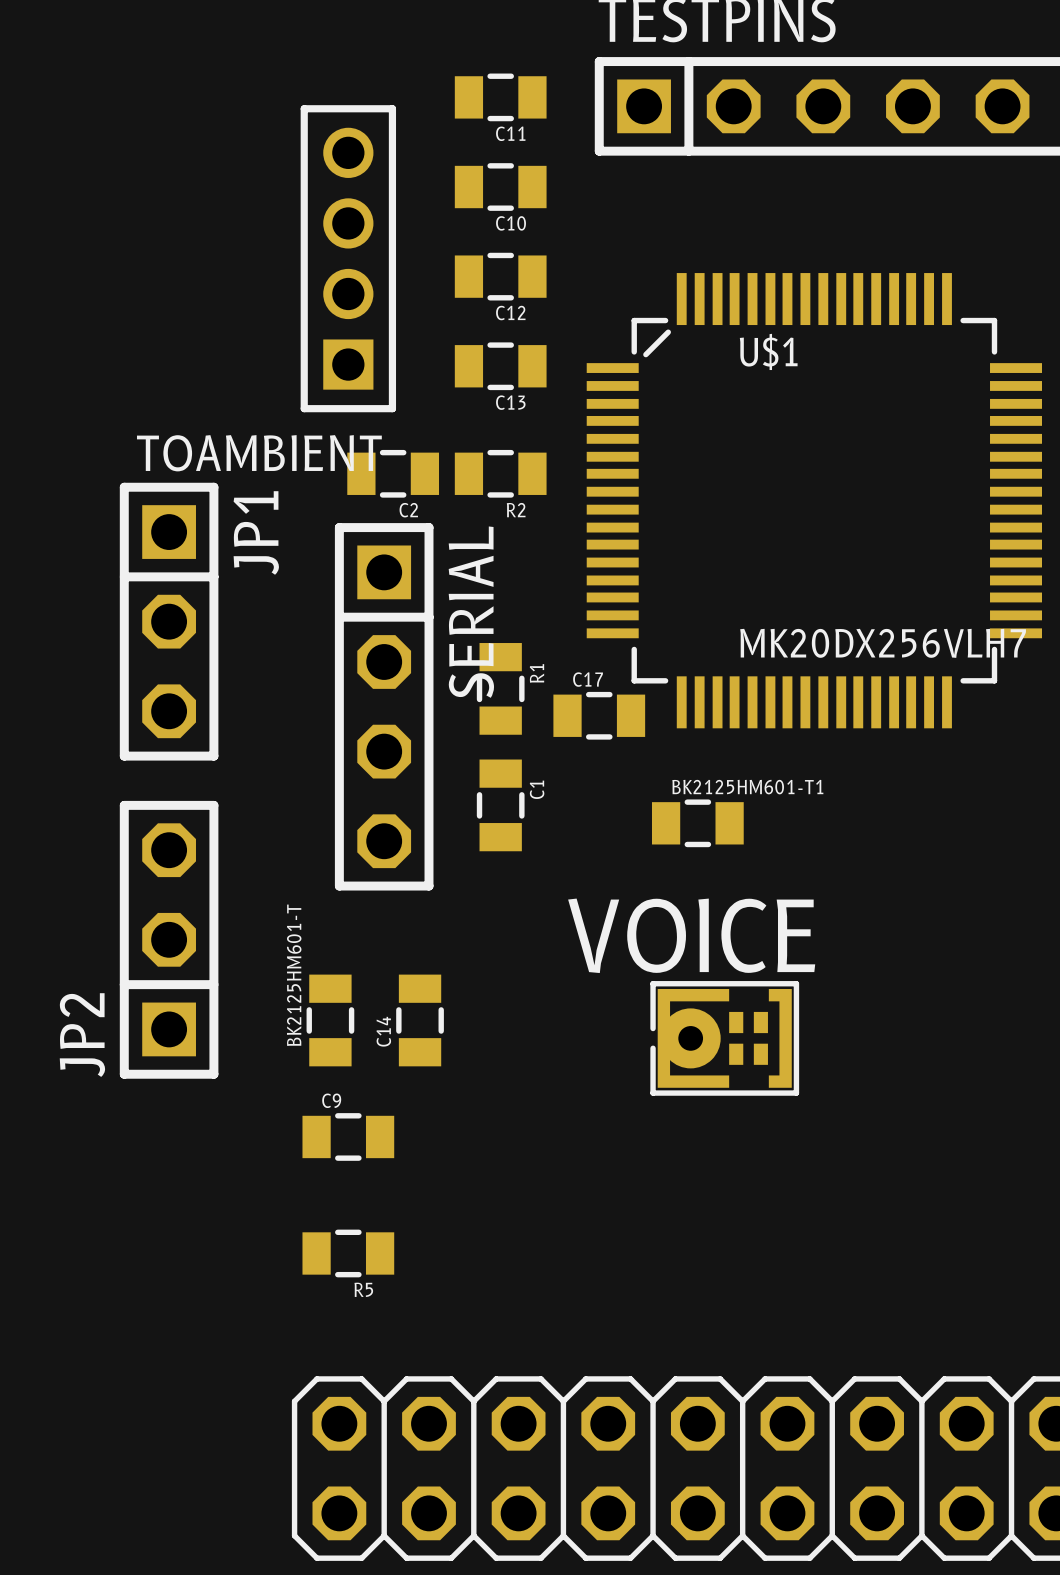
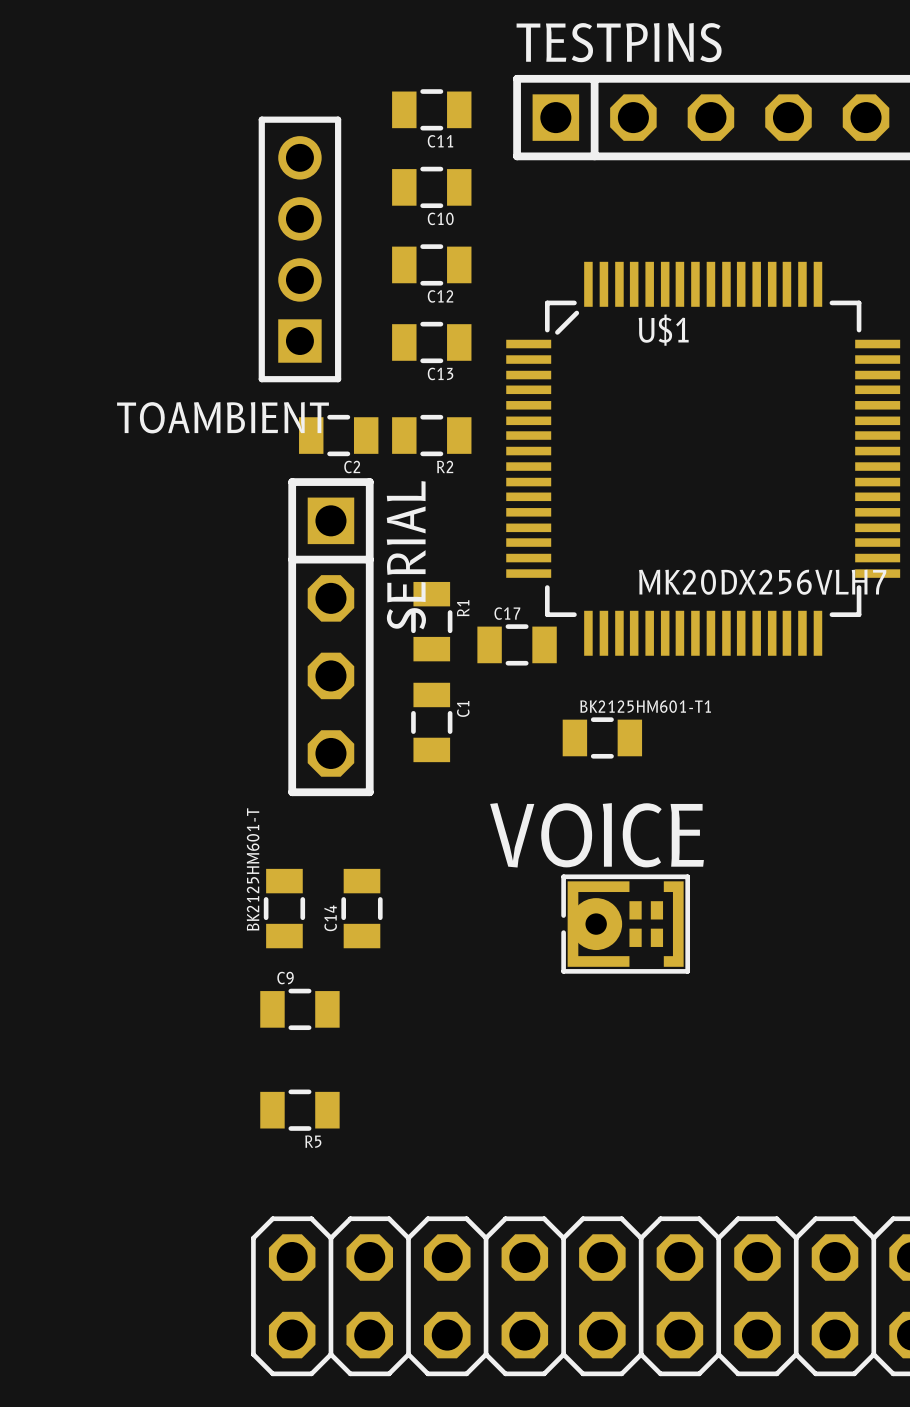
JP1: (169, 621) -> none
JP2: (169, 939) -> none

